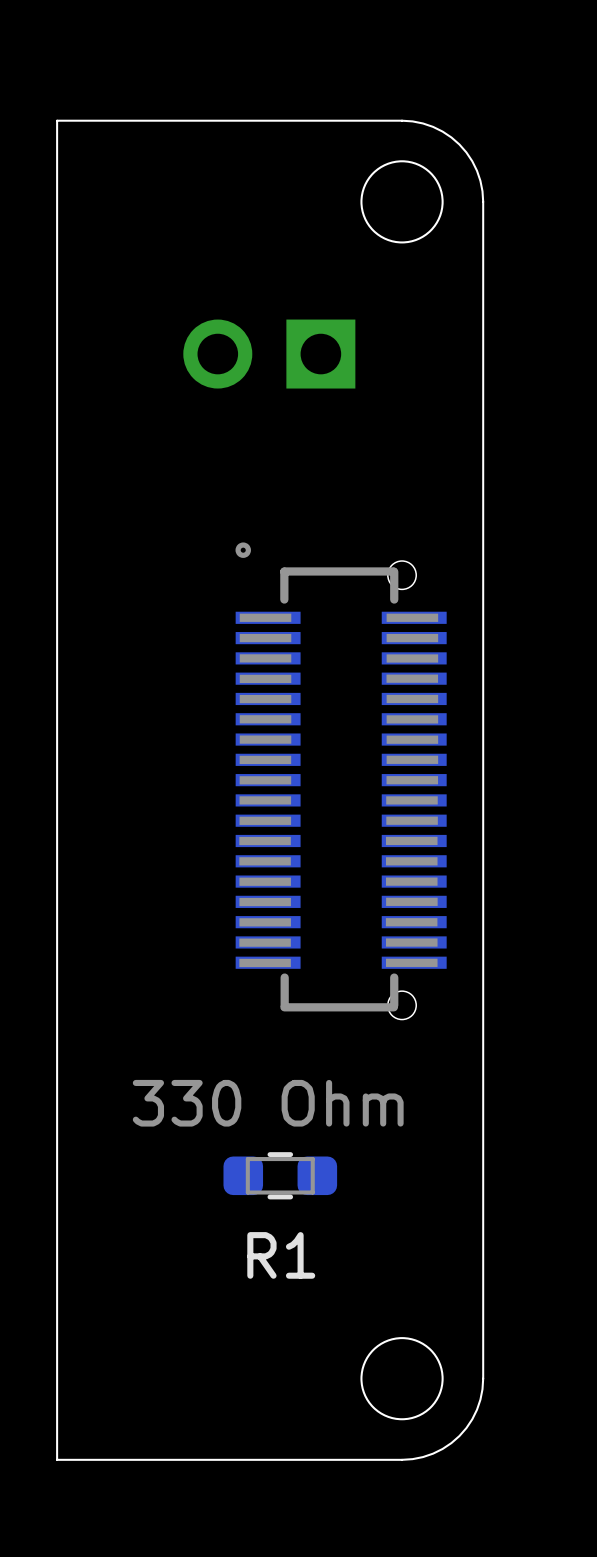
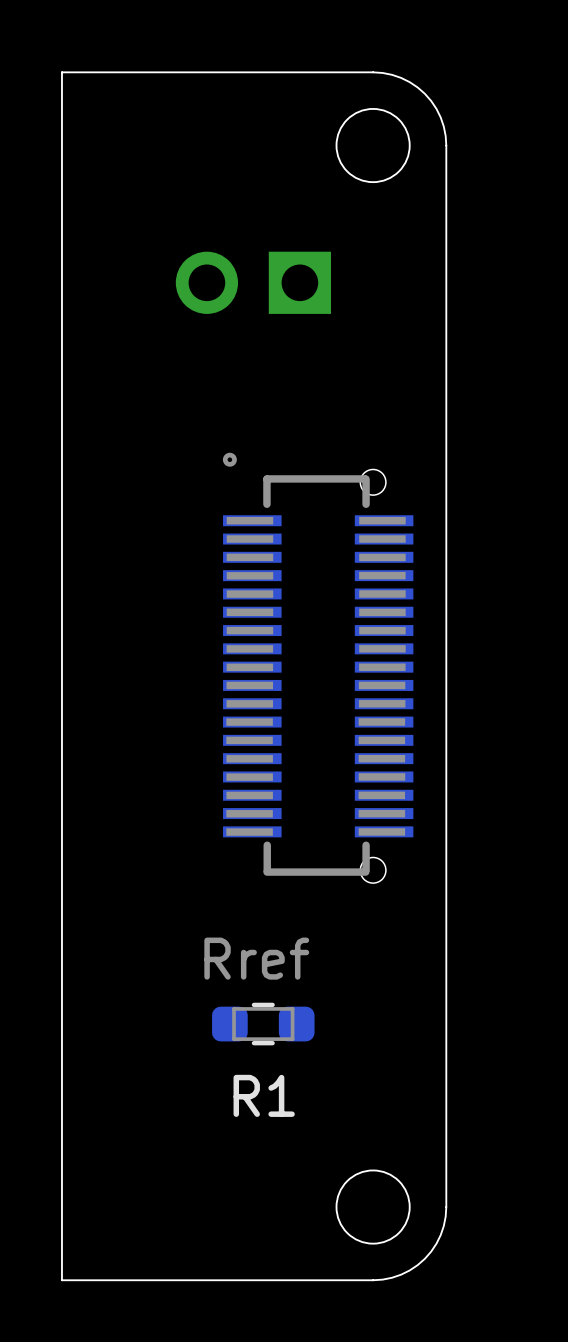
R1 value: 330 Ohm (268, 1103) -> Rref (256, 958)

